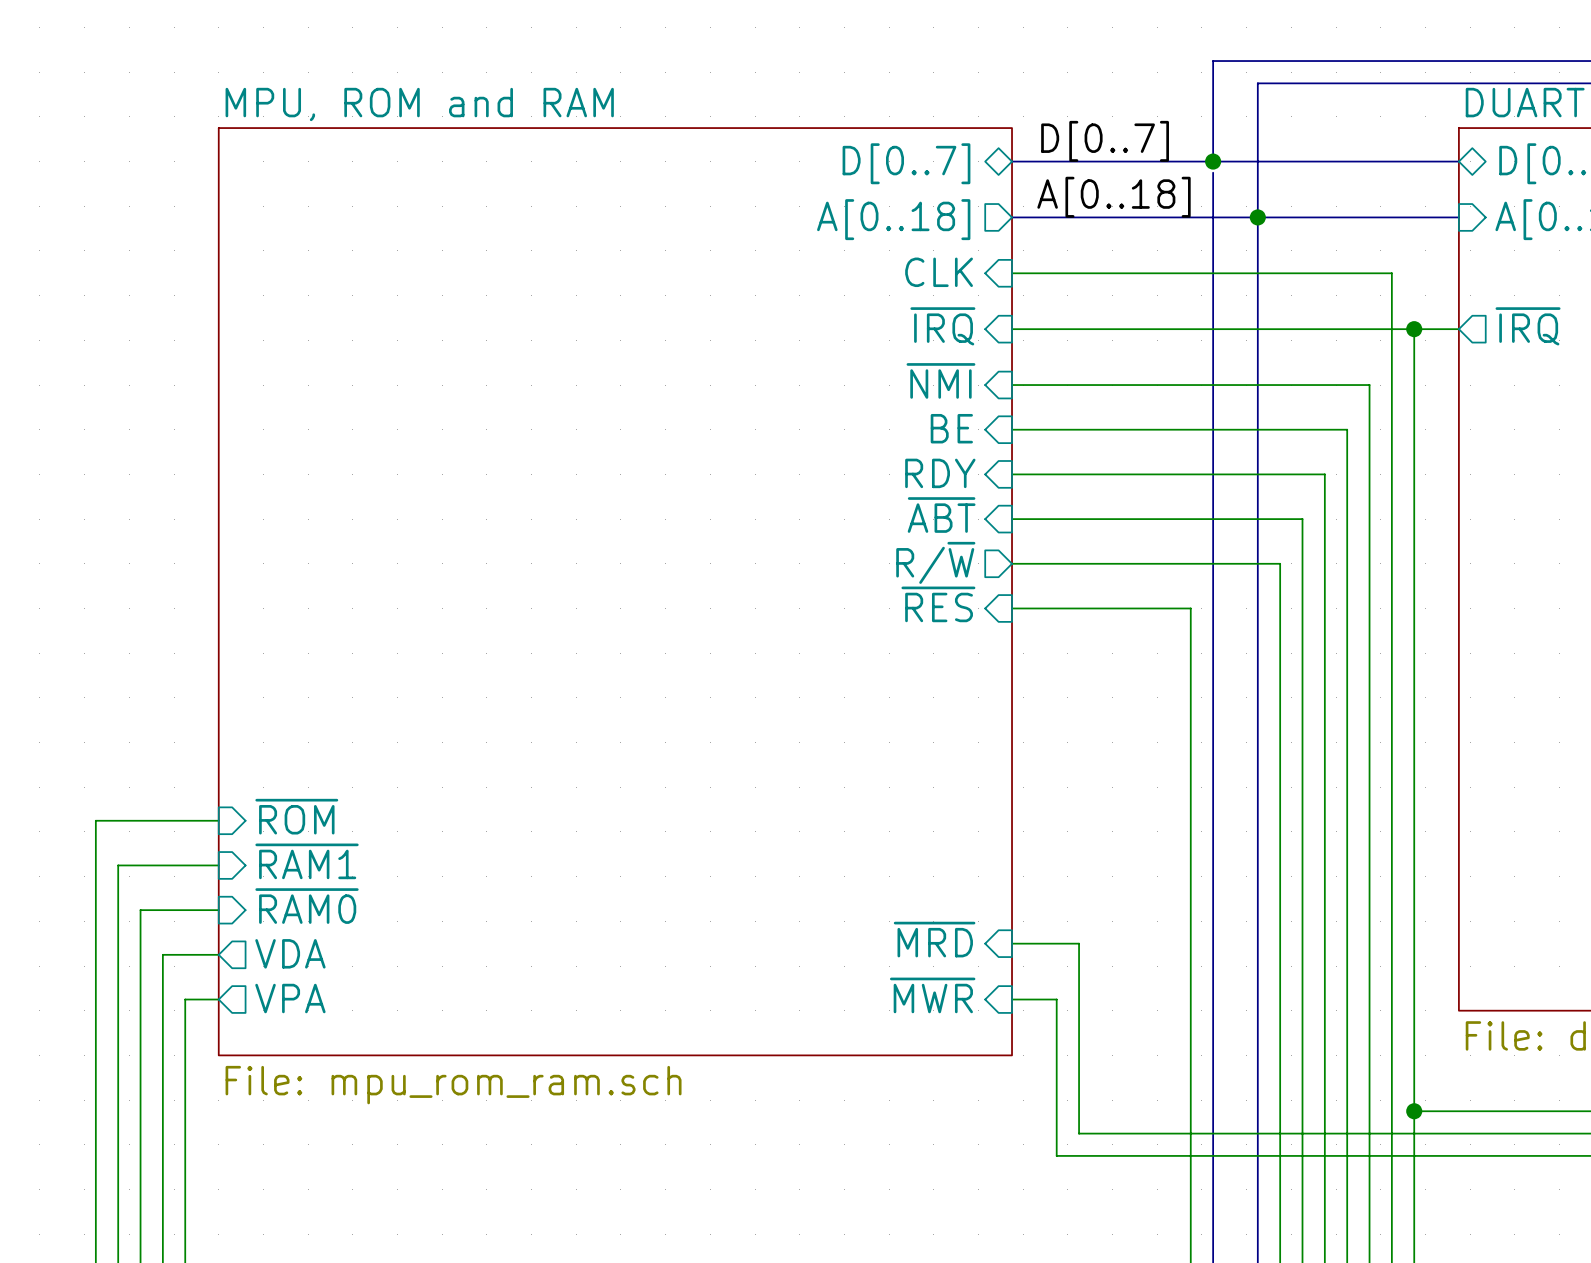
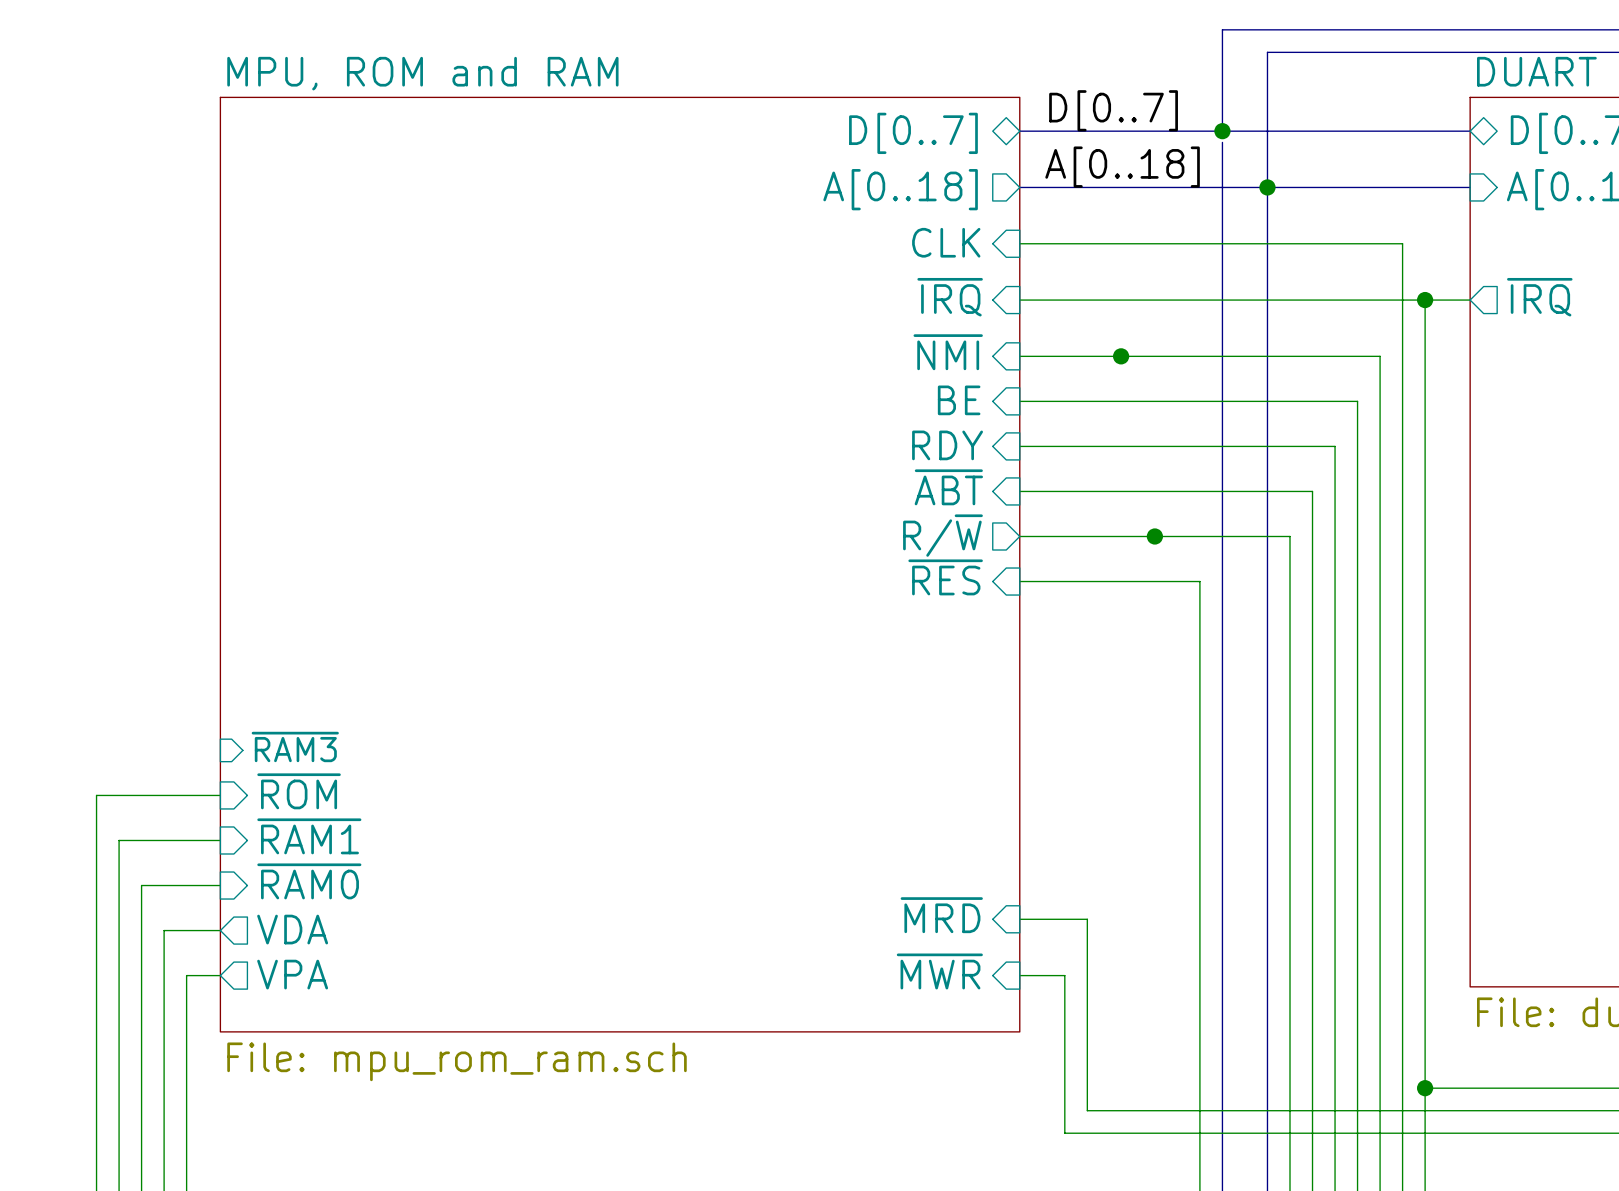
junction: none -> (1121, 356)
junction: none -> (1154, 536)
sheet pin: none -> ~{RAM3} (295, 746)

